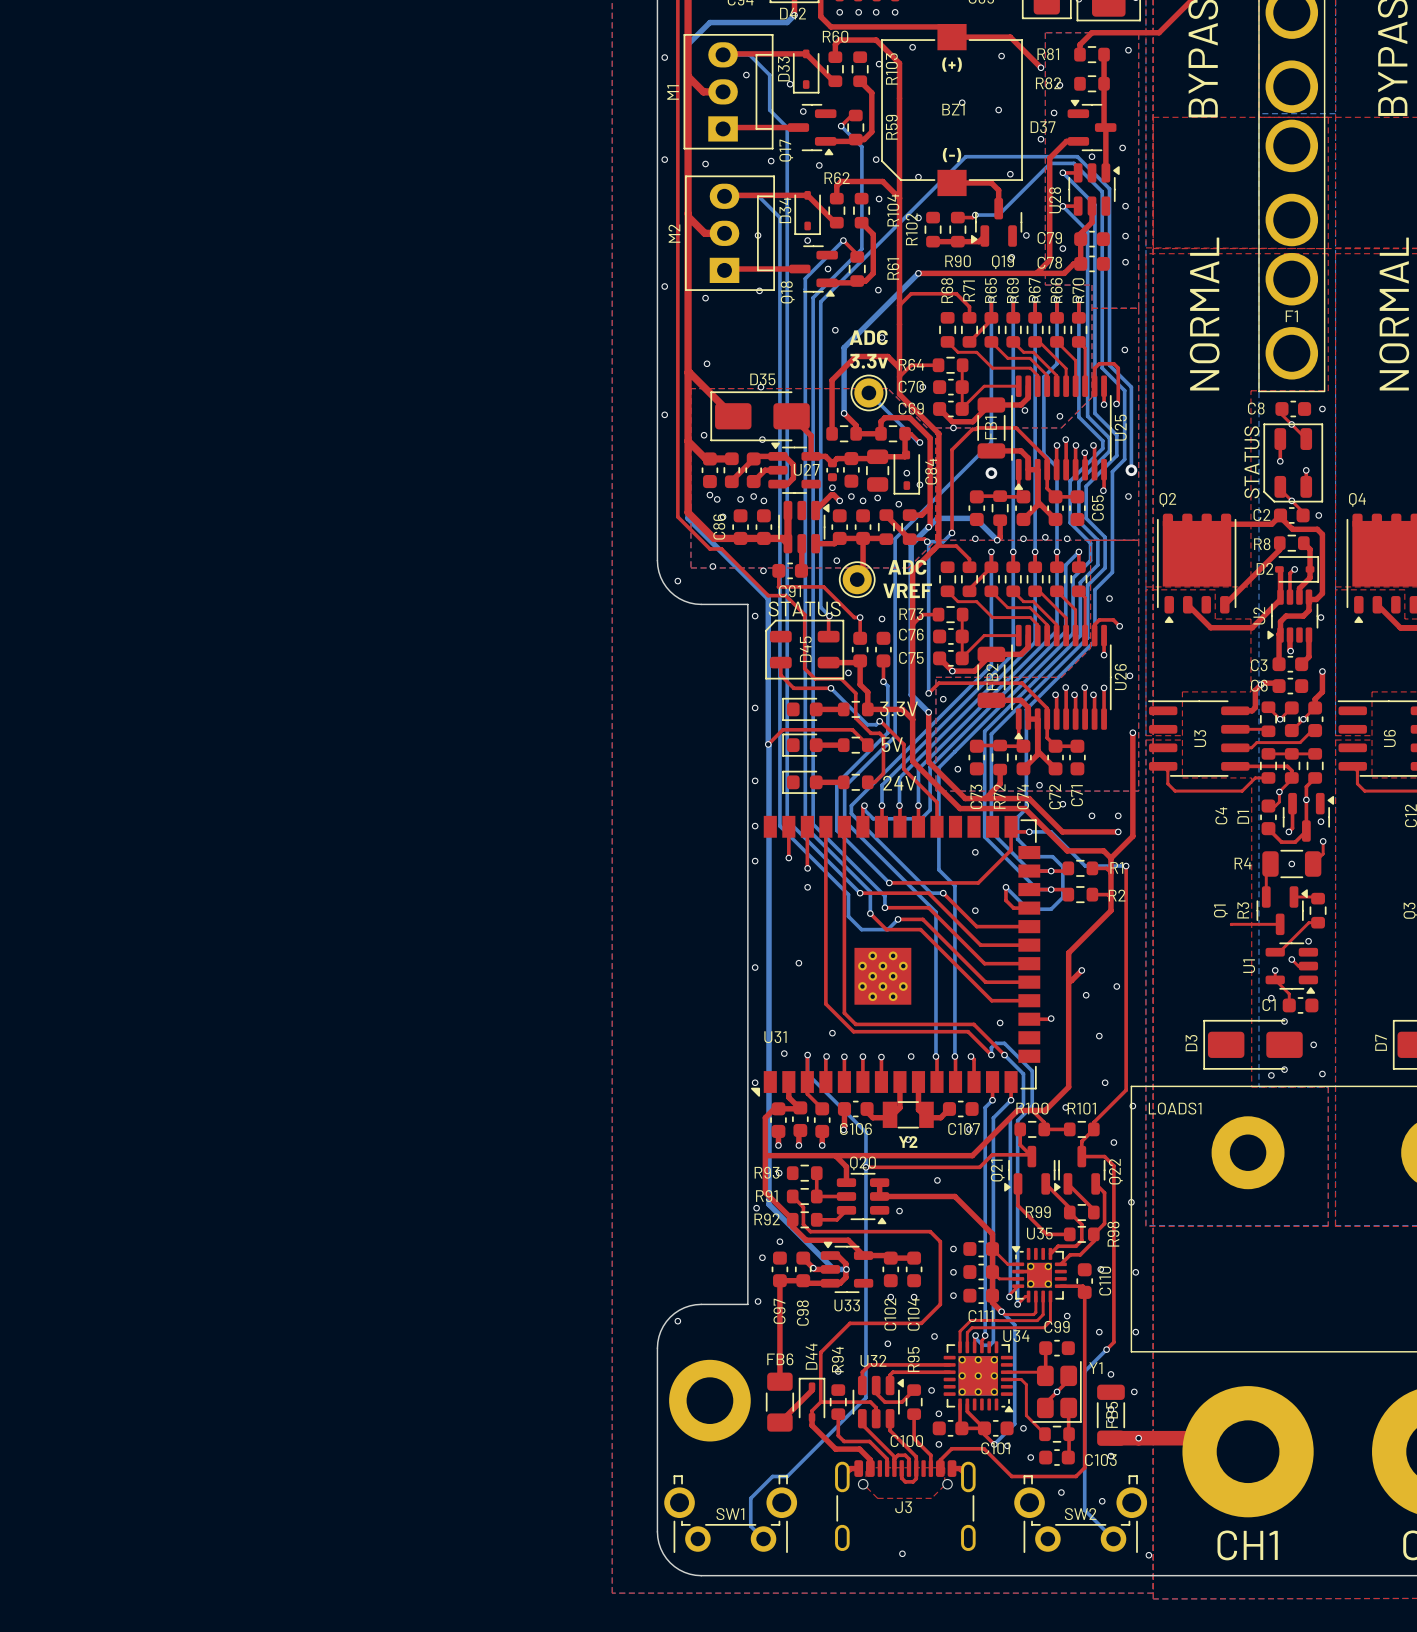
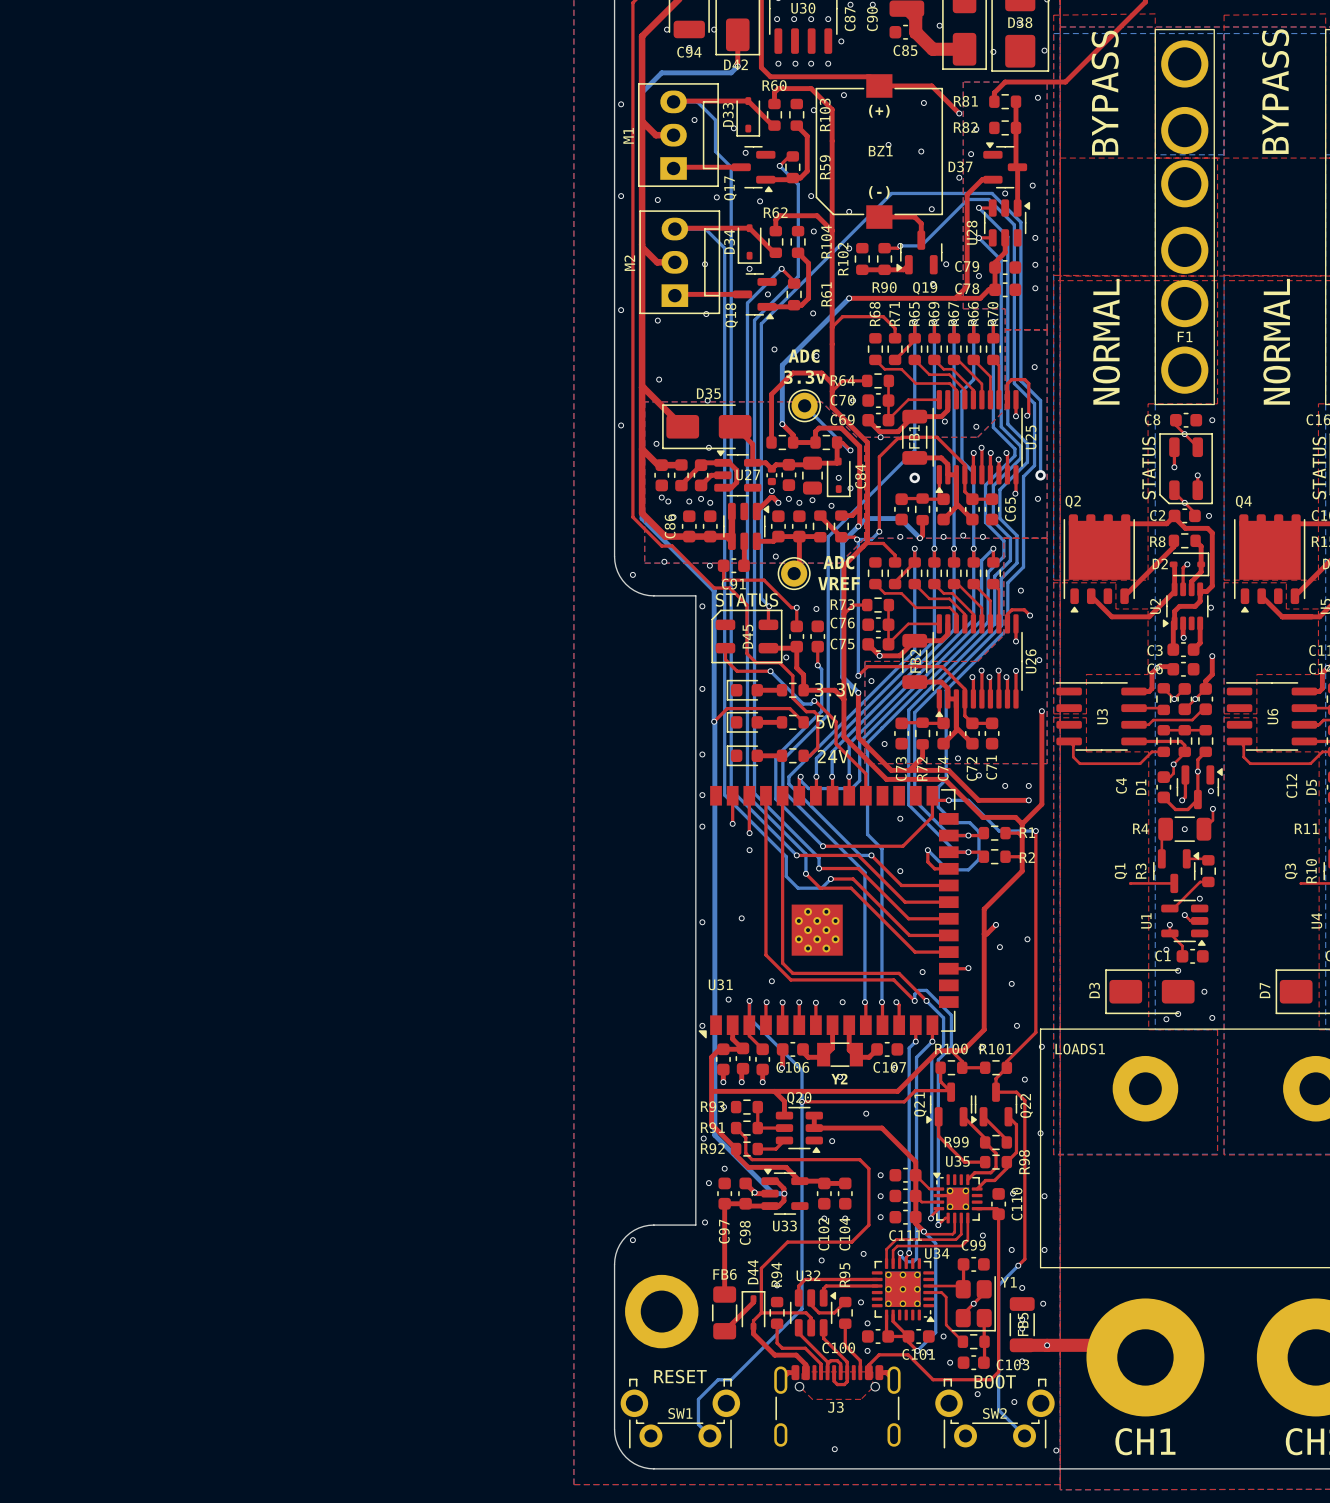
text: none -> RESET (680, 1376)
text: none -> BOOT (995, 1381)

